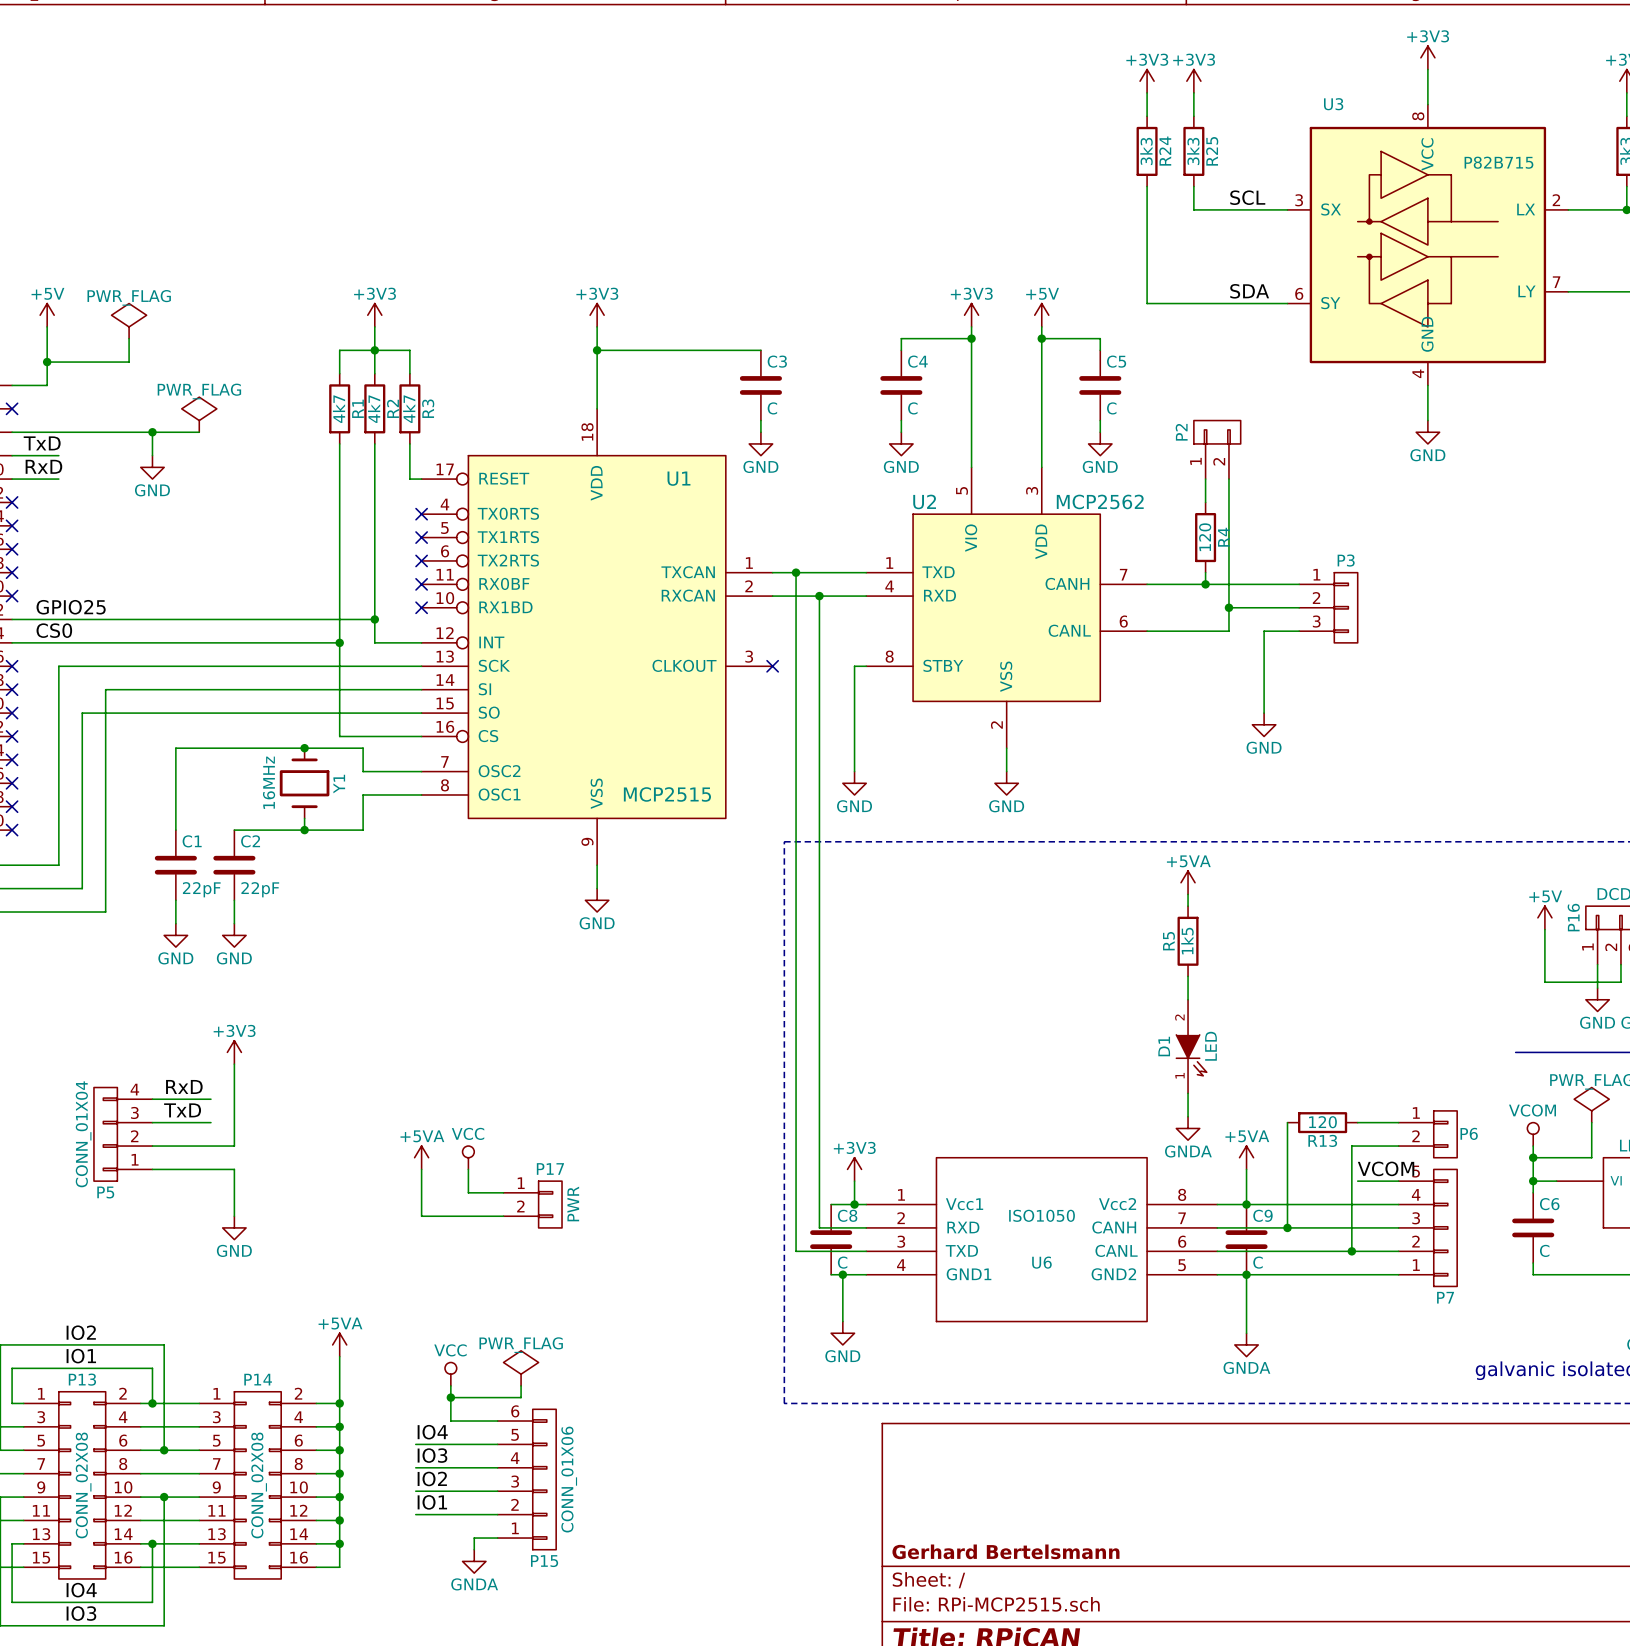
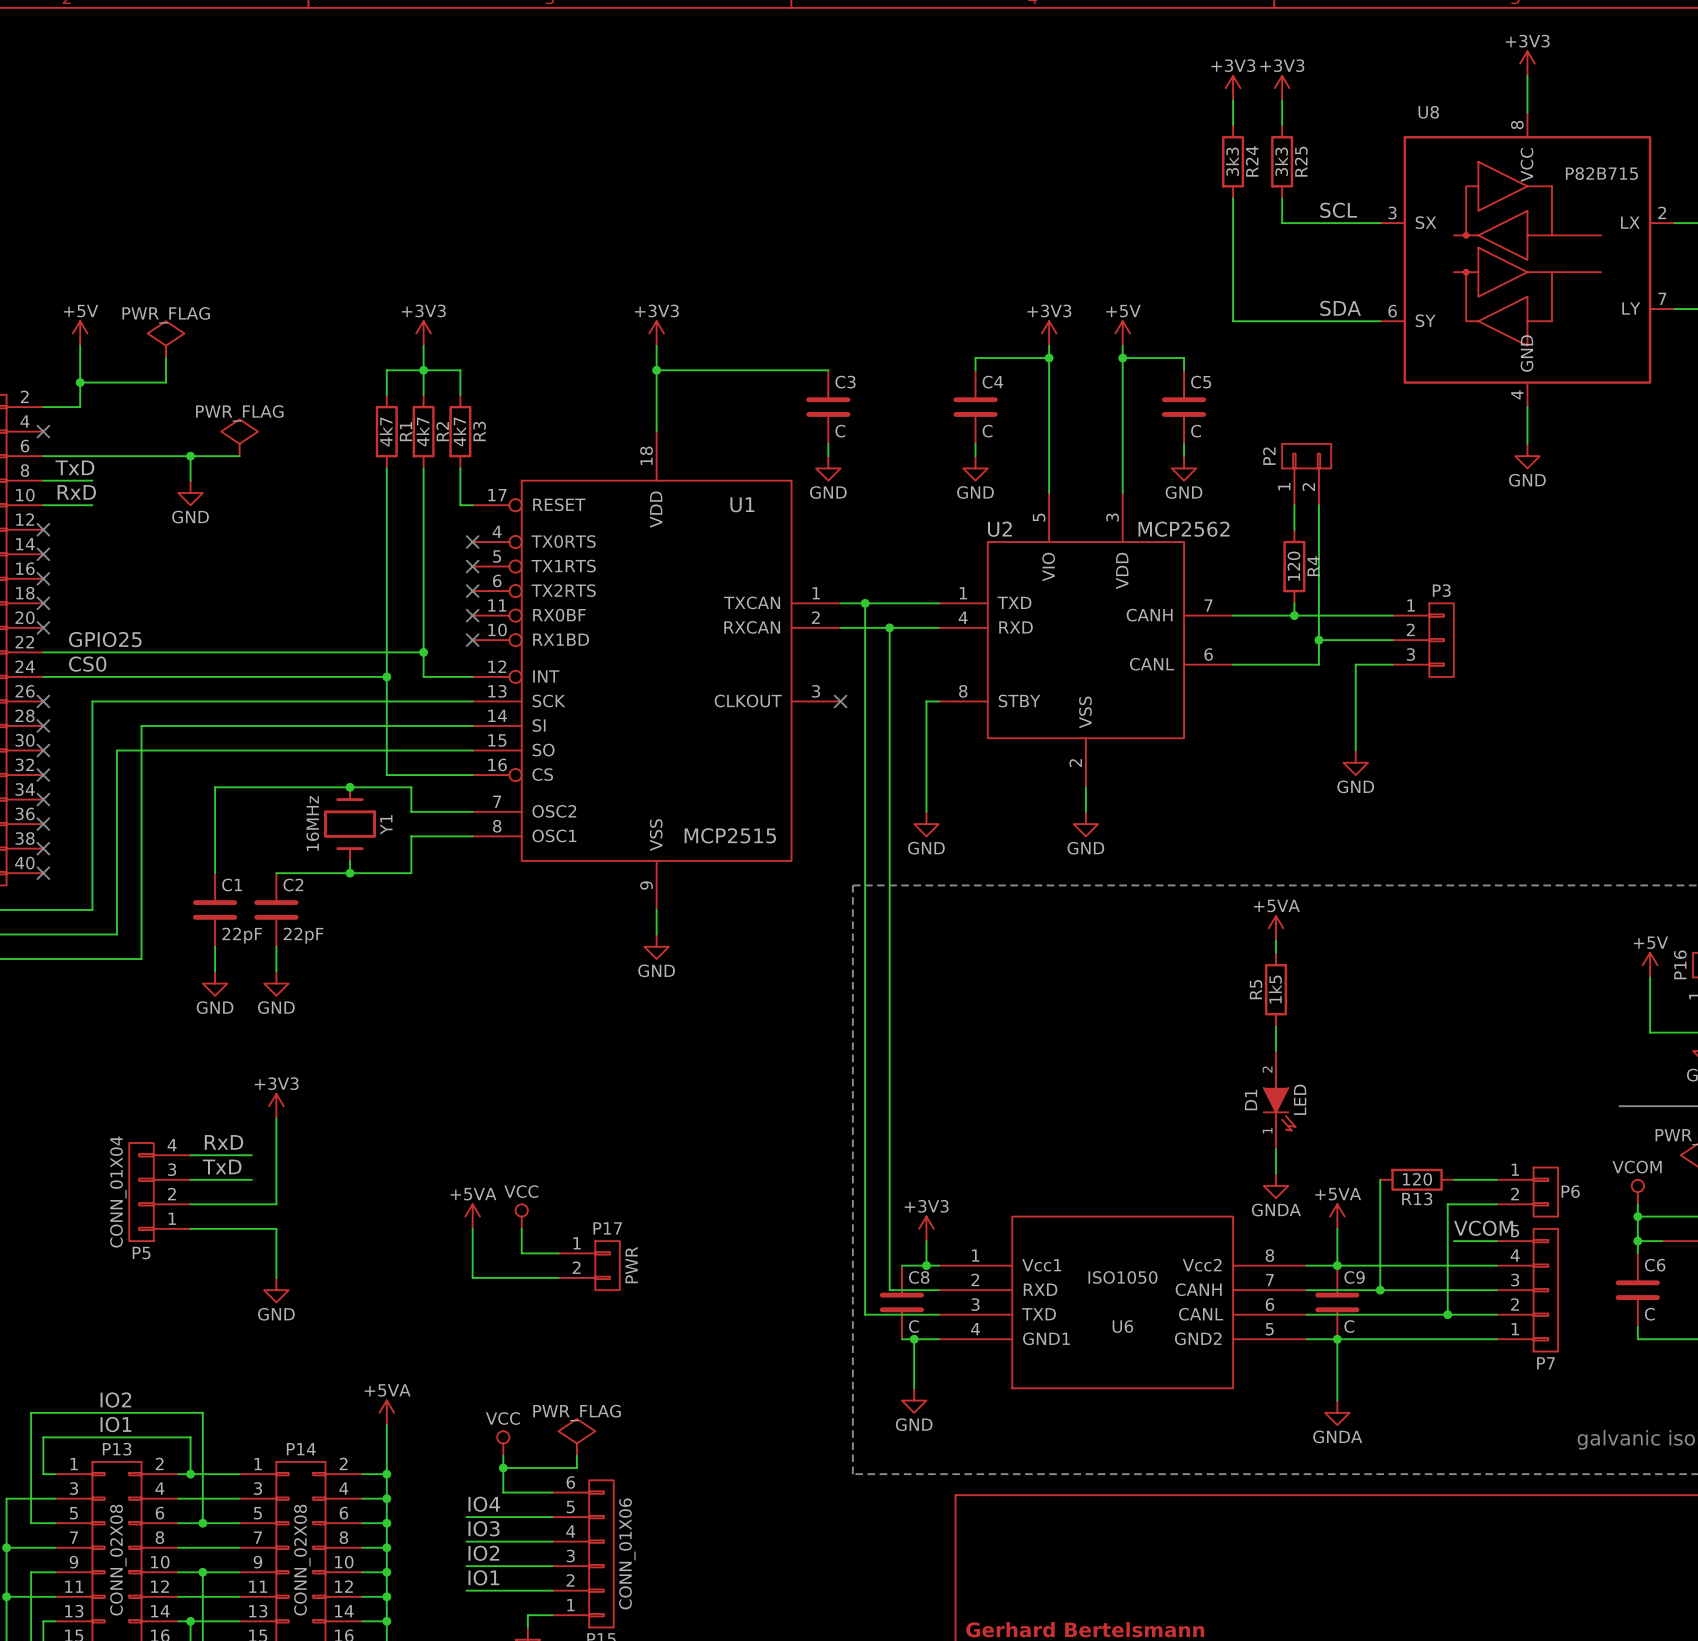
U3 name: U3 (1333, 104) -> U8 (1428, 112)

